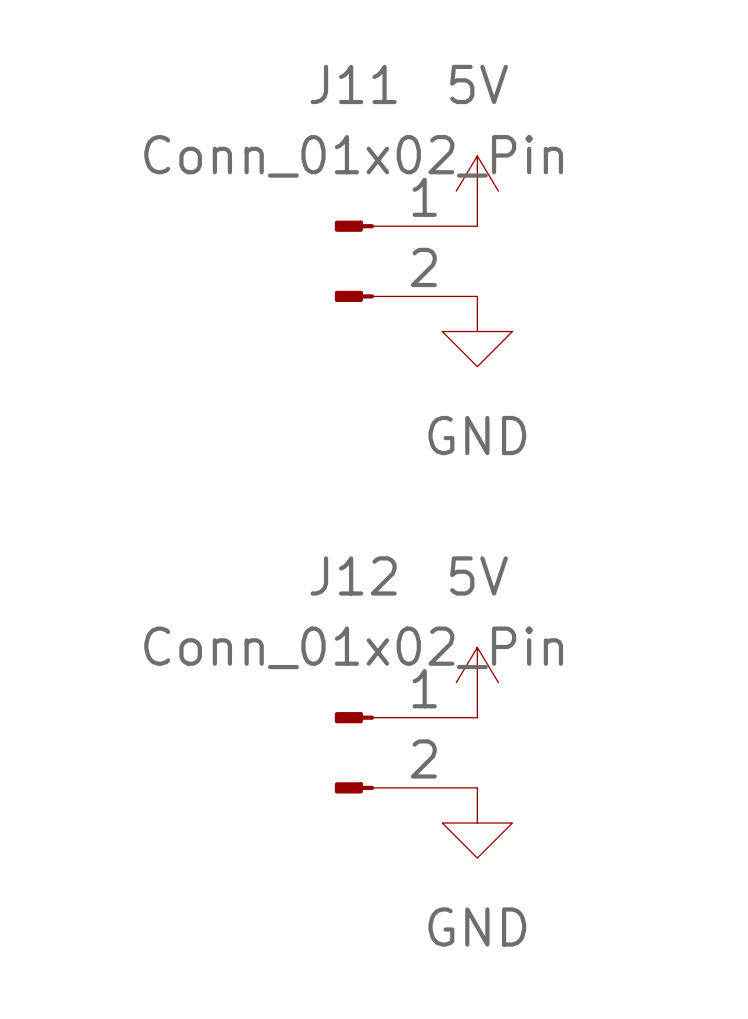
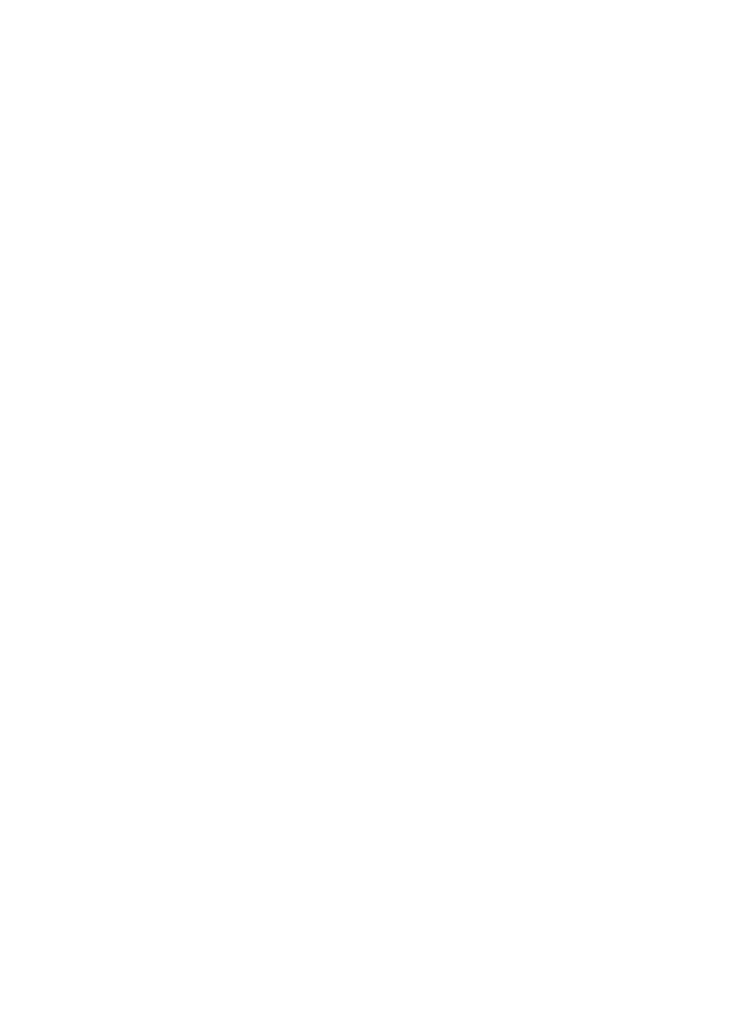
power symbol: 5V (477, 191) -> none
J11: Conn_01x02_Pin (406, 261) -> none
power symbol: GND (477, 331) -> none
power symbol: 5V (477, 682) -> none
J12: Conn_01x02_Pin (406, 752) -> none
power symbol: GND (477, 823) -> none

